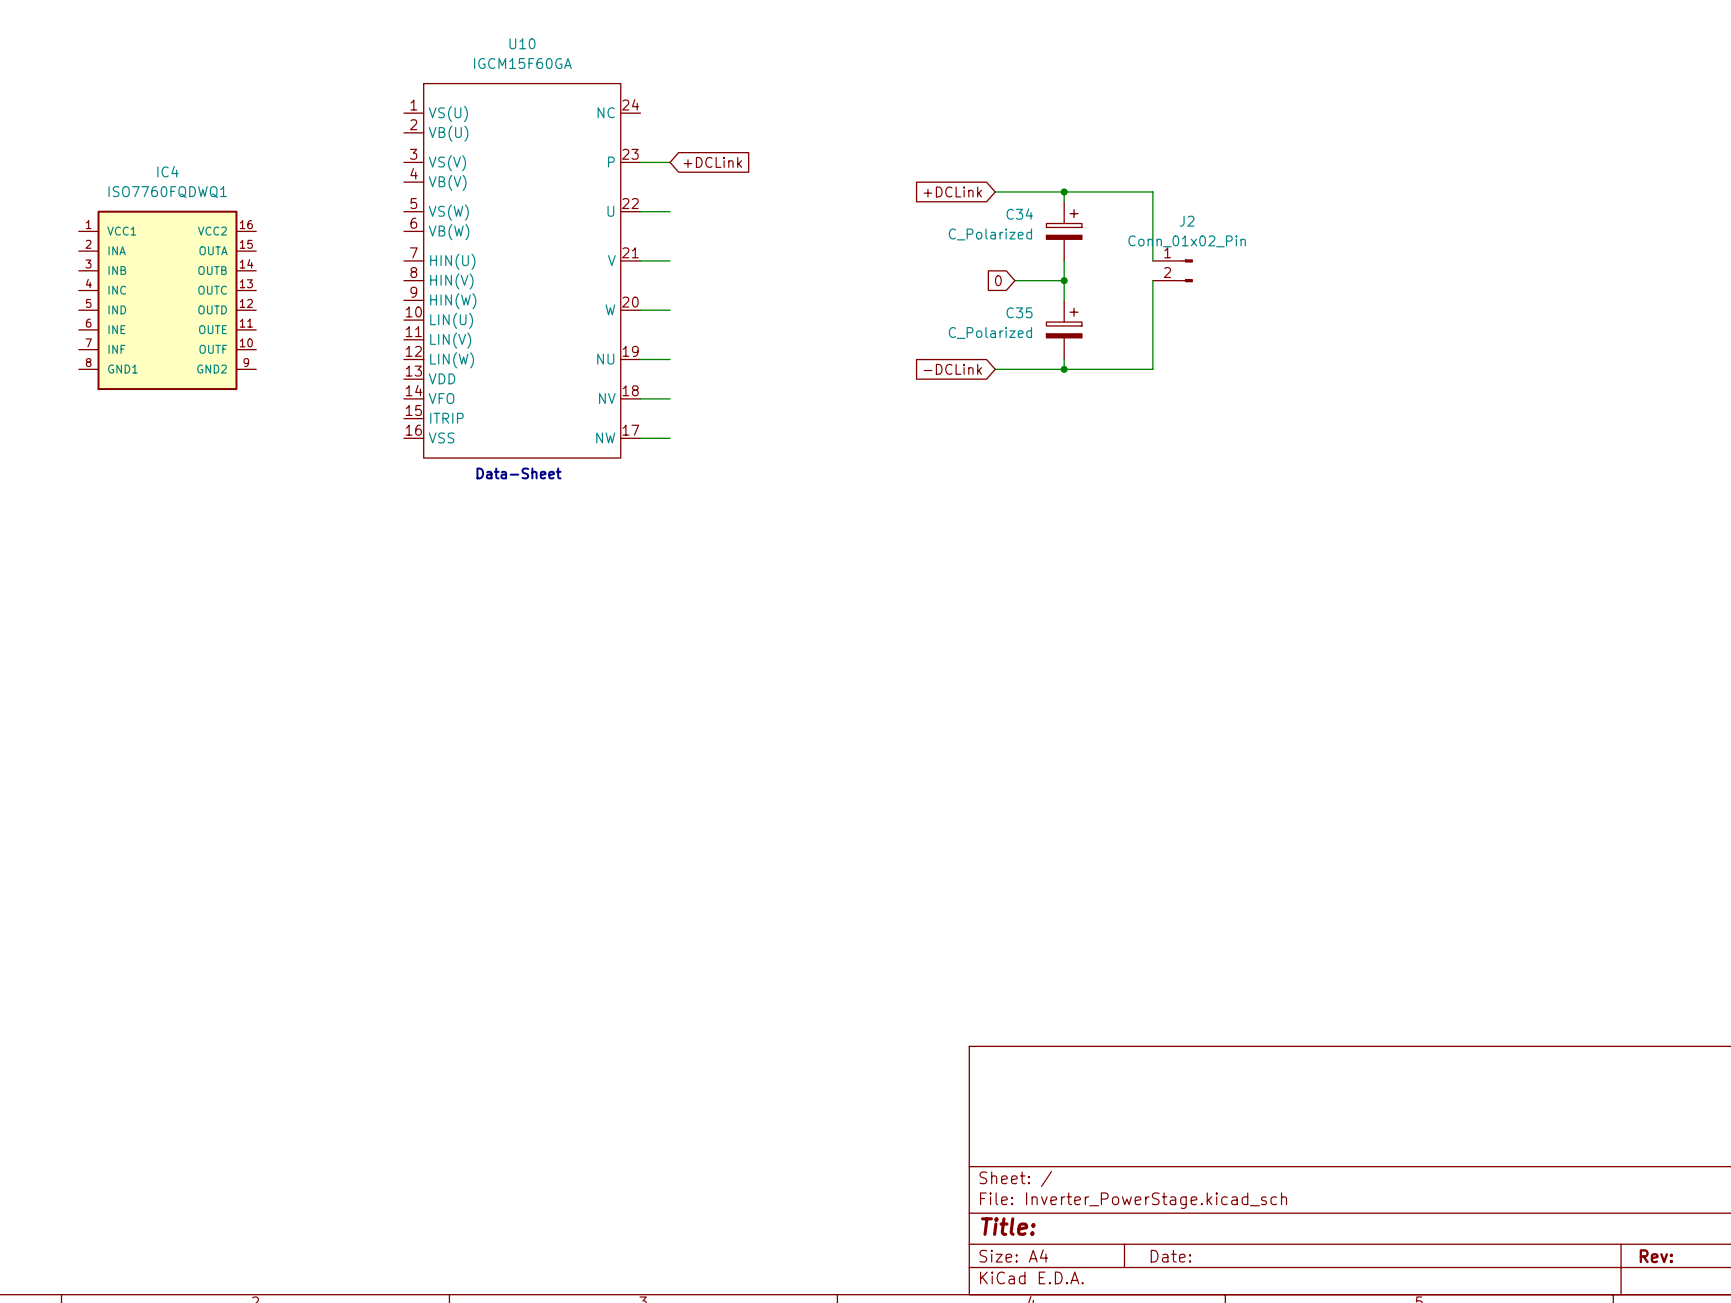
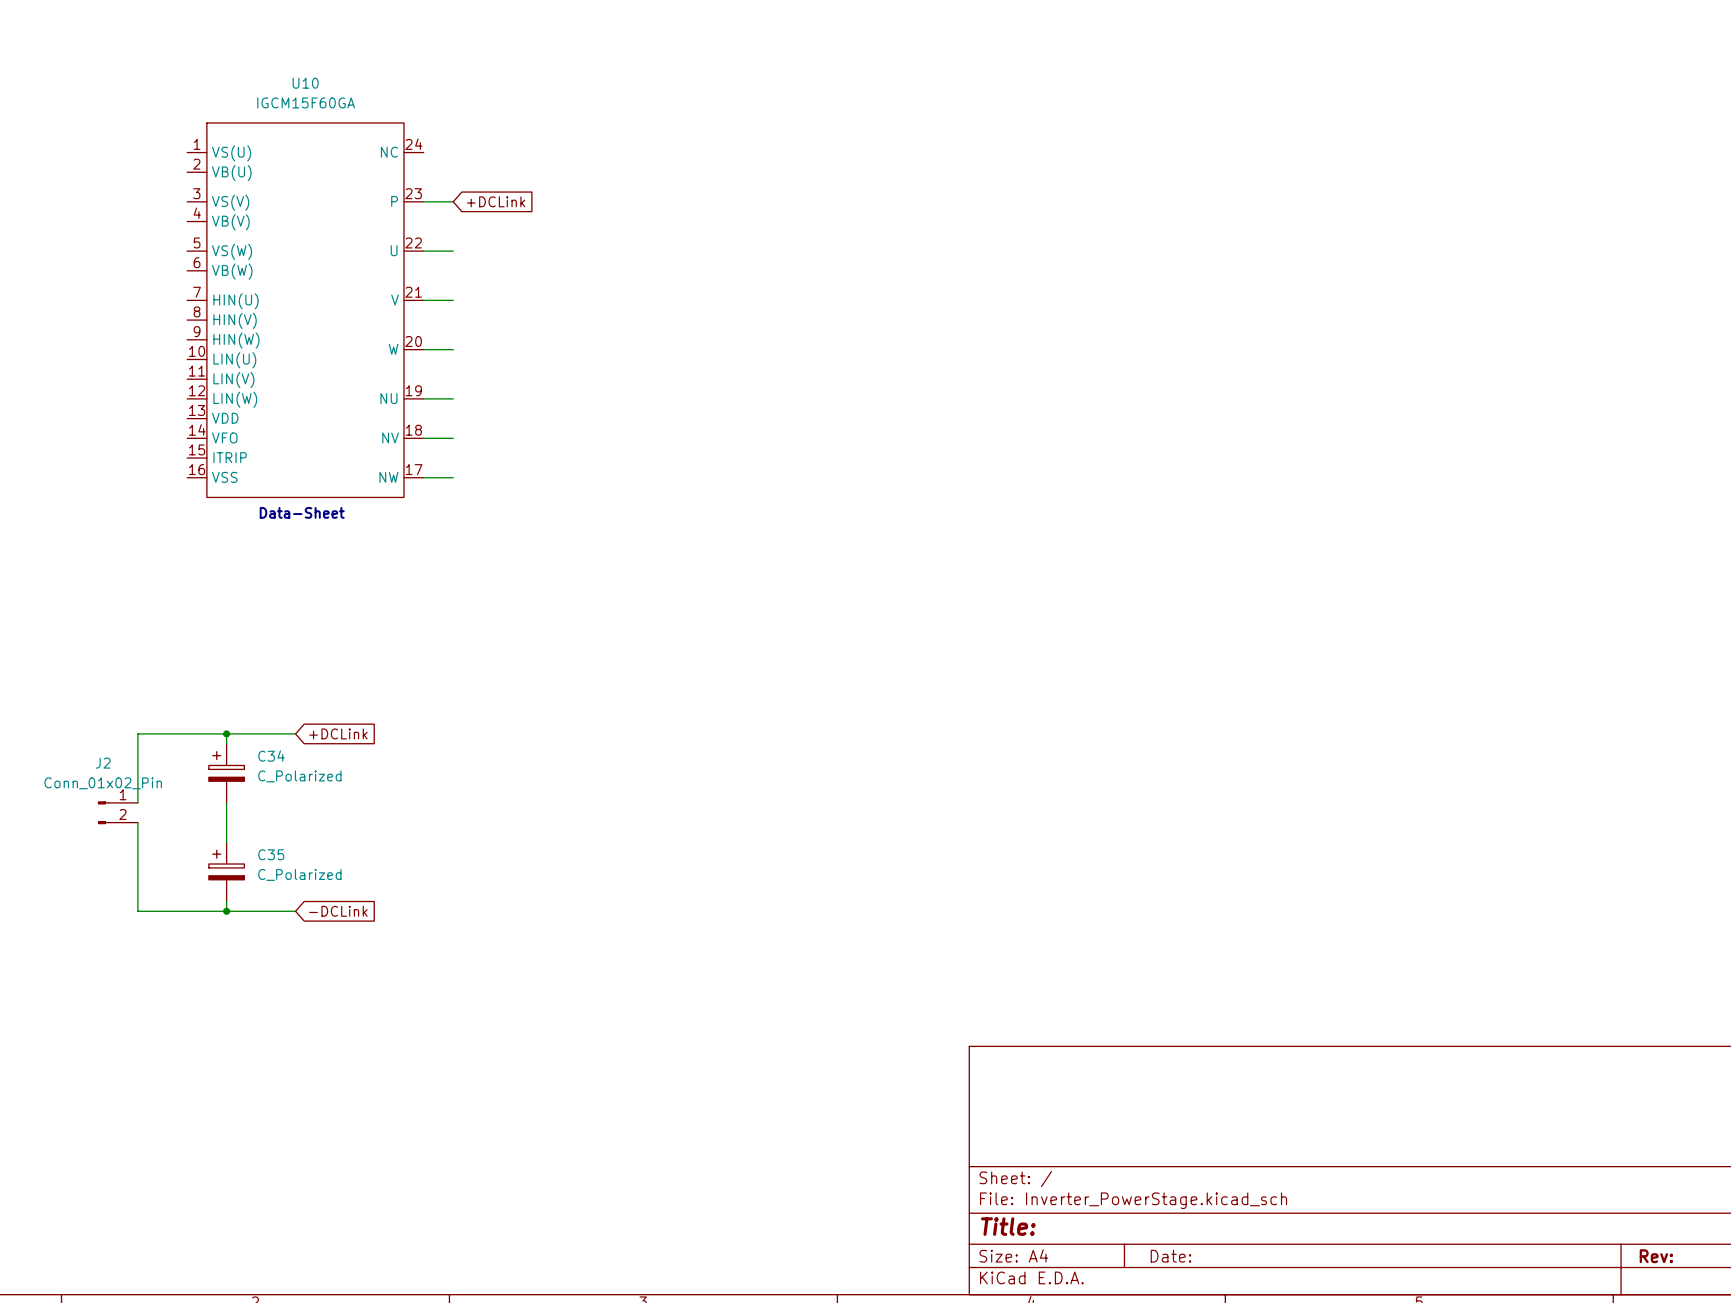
wire: (640, 162) (670, 162) -> none
global label: +DCLink (712, 162) -> none
global label: +DCLink (952, 191) -> none
wire: (995, 191) (1152, 191) (1152, 260) -> none
wire: (1064, 191) (1064, 201) -> none
junction: (1064, 191) -> none
wire: none -> (423, 201) (453, 201)
global label: none -> +DCLink (496, 201)
wire: (640, 211) (670, 211) -> none
C34 flip: as is (1064, 224) -> left-right (226, 766)
C34 position: (1064, 231) -> (226, 773)
wire: none -> (423, 251) (453, 251)
wire: (640, 260) (670, 260) -> none
wire: (1064, 260) (1064, 300) -> none
U10 position: (522, 270) -> (305, 310)
J2 position: (1172, 270) -> (117, 812)
J2 flip: as is (1187, 270) -> left-right (103, 812)
global label: 0 (998, 280) -> none
wire: (1014, 280) (1064, 280) -> none
junction: (1064, 280) -> none
wire: (1152, 280) (1152, 369) (995, 369) -> none
IC4: ISO7760FQDWQ1 (167, 300) -> none
wire: none -> (423, 300) (453, 300)
wire: (640, 310) (670, 310) -> none
C35 flip: as is (1064, 323) -> left-right (226, 864)
C35 position: (1064, 329) -> (226, 871)
wire: none -> (423, 349) (453, 349)
wire: (640, 359) (670, 359) -> none
wire: (1064, 359) (1064, 369) -> none
global label: -DCLink (952, 369) -> none
junction: (1064, 369) -> none
wire: none -> (423, 398) (453, 398)
wire: (640, 398) (670, 398) -> none
wire: none -> (423, 438) (453, 438)
wire: (640, 438) (670, 438) -> none
text: Data-Sheet (518, 473) -> none
wire: none -> (423, 477) (453, 477)
text: none -> Data-Sheet (302, 512)
wire: none -> (226, 733) (226, 743)
junction: none -> (226, 733)
wire: none -> (295, 733) (137, 733) (137, 802)
global label: none -> +DCLink (338, 733)
wire: none -> (226, 802) (226, 842)
wire: none -> (137, 822) (137, 911) (295, 911)
wire: none -> (226, 901) (226, 911)
junction: none -> (226, 911)
global label: none -> -DCLink (338, 911)

